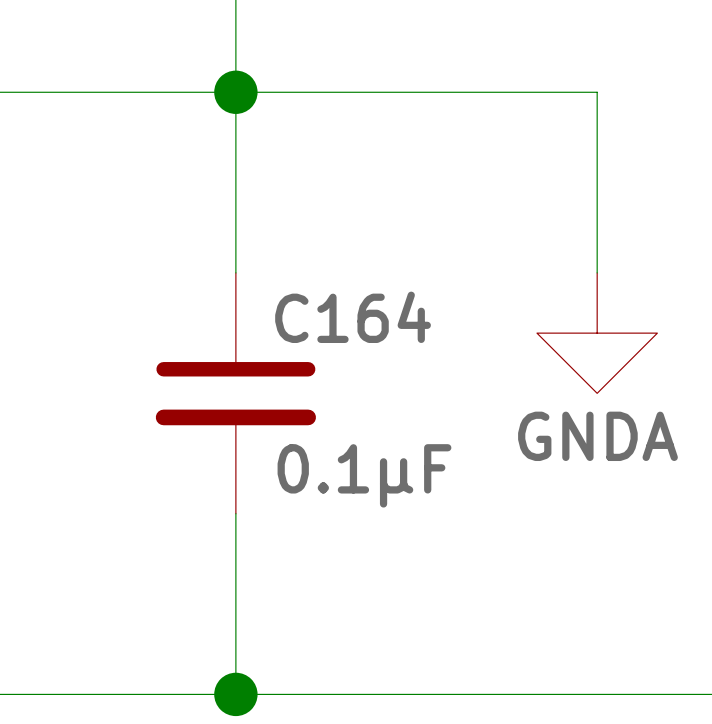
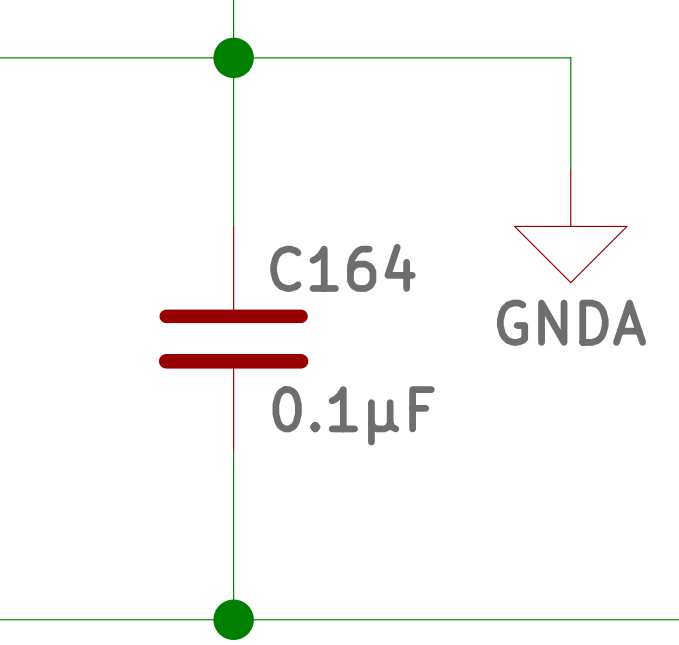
power symbol position: GNDA (597, 333) -> GNDA (570, 226)

